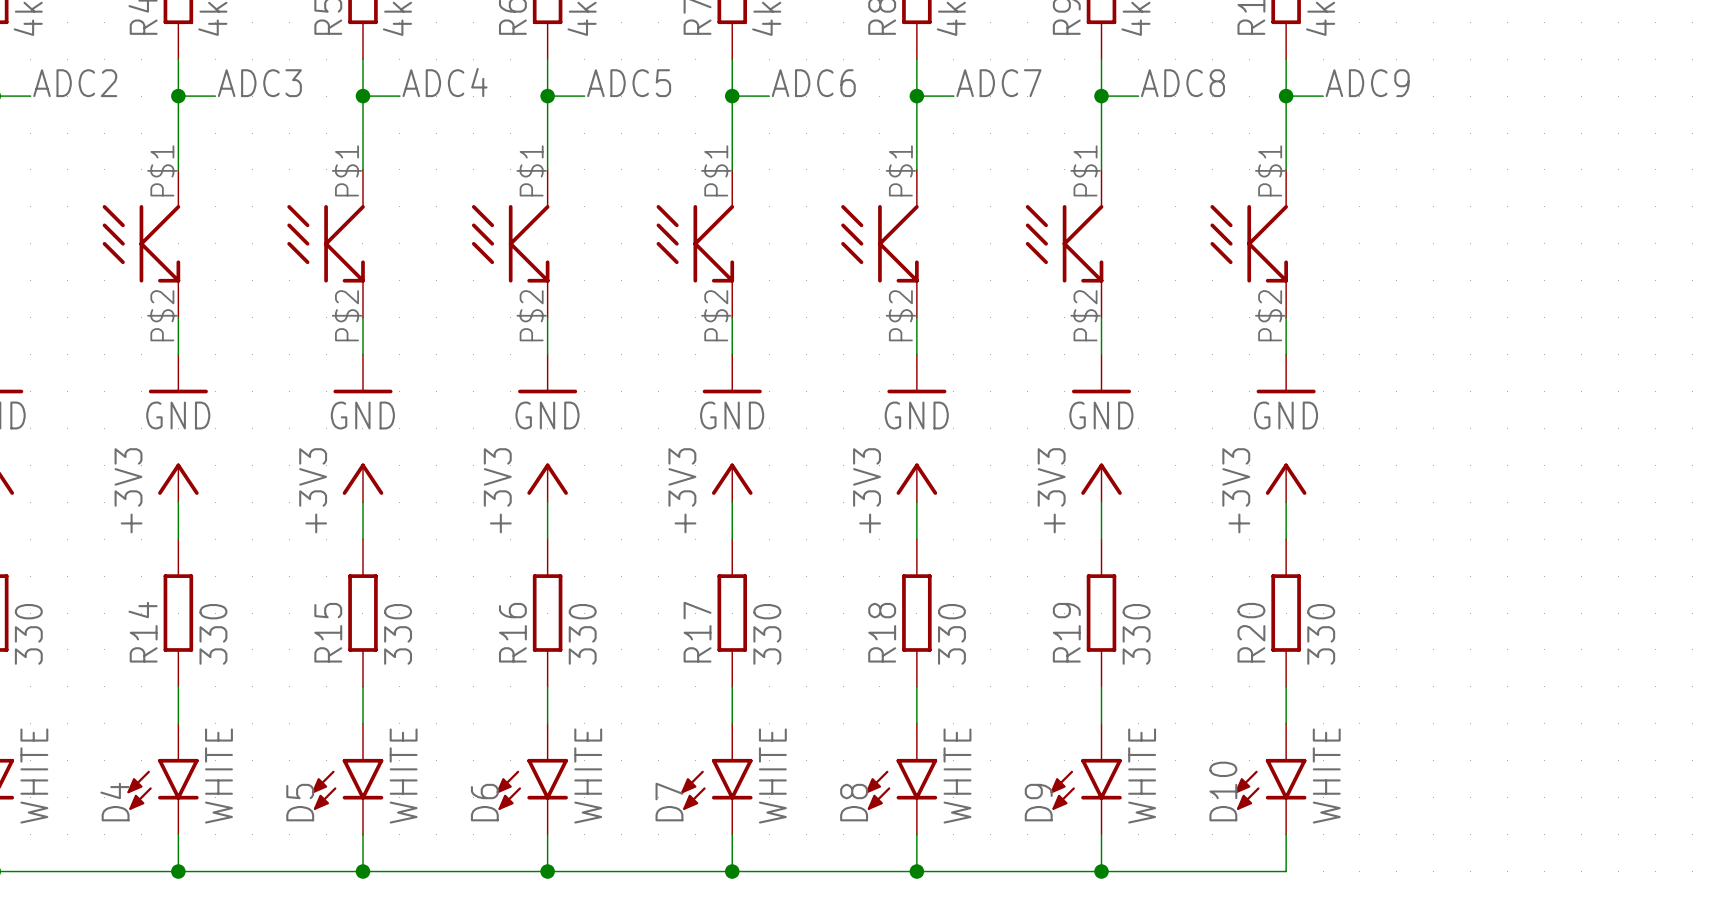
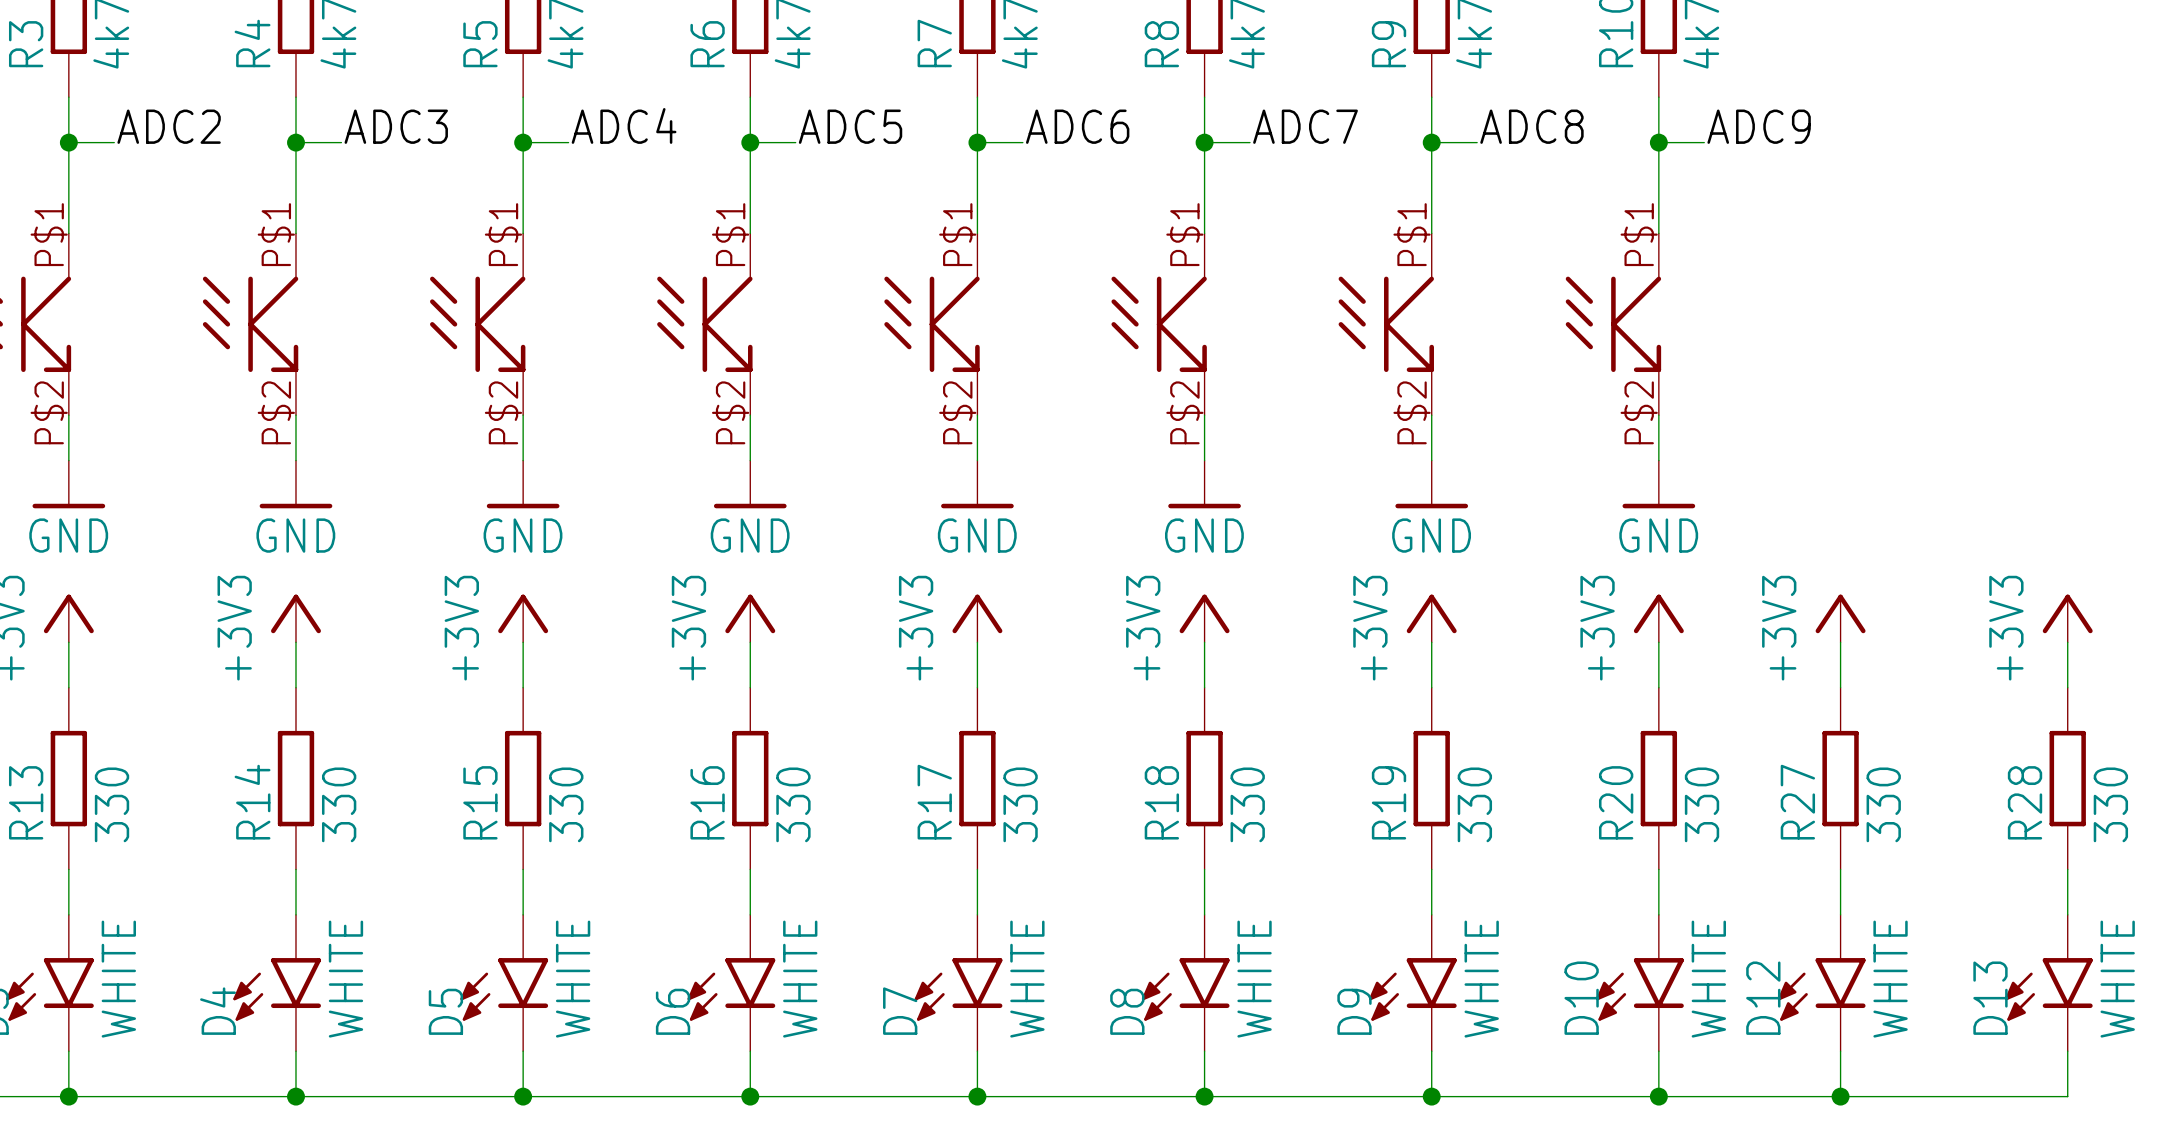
power symbol: none -> +3V3 (1840, 618)
power symbol: none -> +3V3 (2067, 618)
wire: none -> (1840, 642) (1840, 687)
wire: none -> (2067, 642) (2067, 687)
R27: none -> 330 (1840, 778)
R28: none -> 330 (2067, 778)
wire: none -> (1840, 869) (1840, 914)
wire: none -> (2067, 869) (2067, 914)
D12: none -> WHITE (1821, 983)
D13: none -> WHITE (2048, 983)
wire: none -> (1840, 1051) (1840, 1096)
wire: none -> (2067, 1051) (2067, 1096) (1658, 1096)
junction: none -> (1658, 1096)
junction: none -> (1840, 1096)

